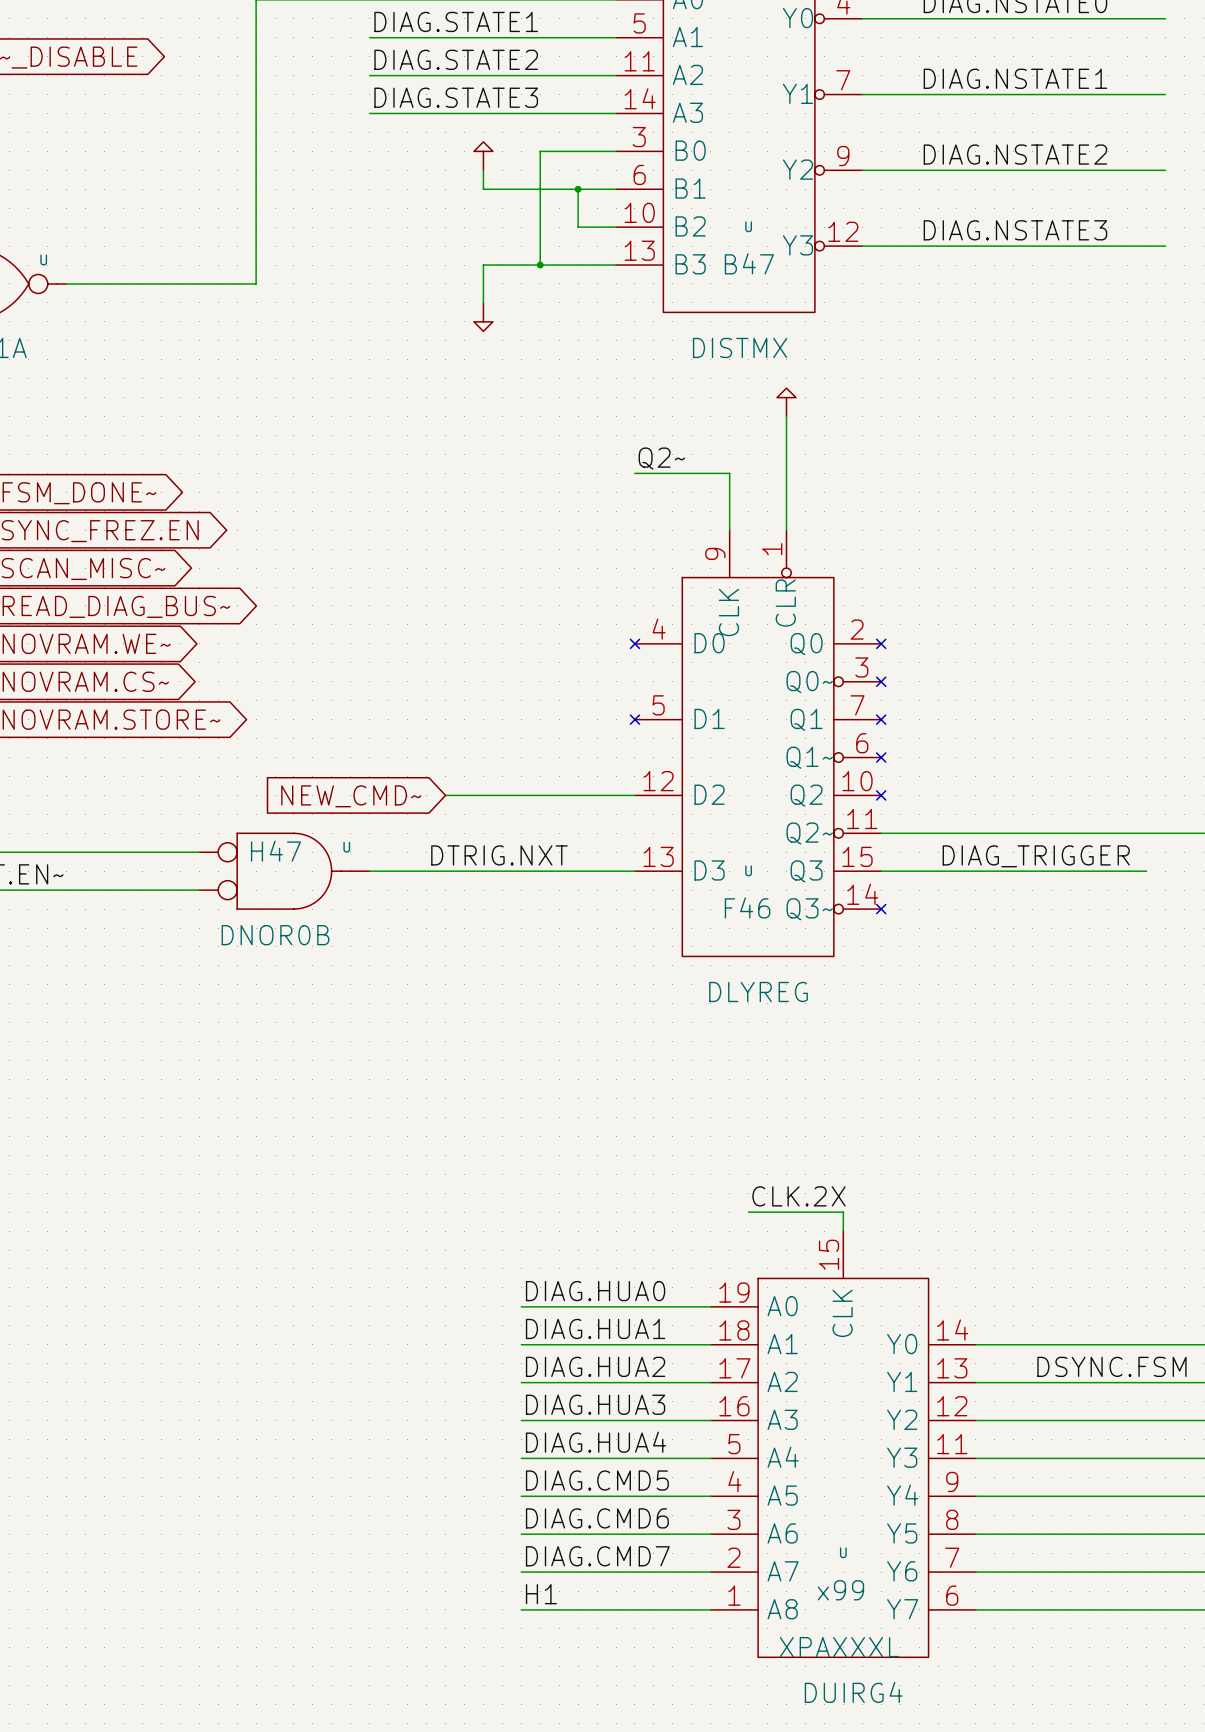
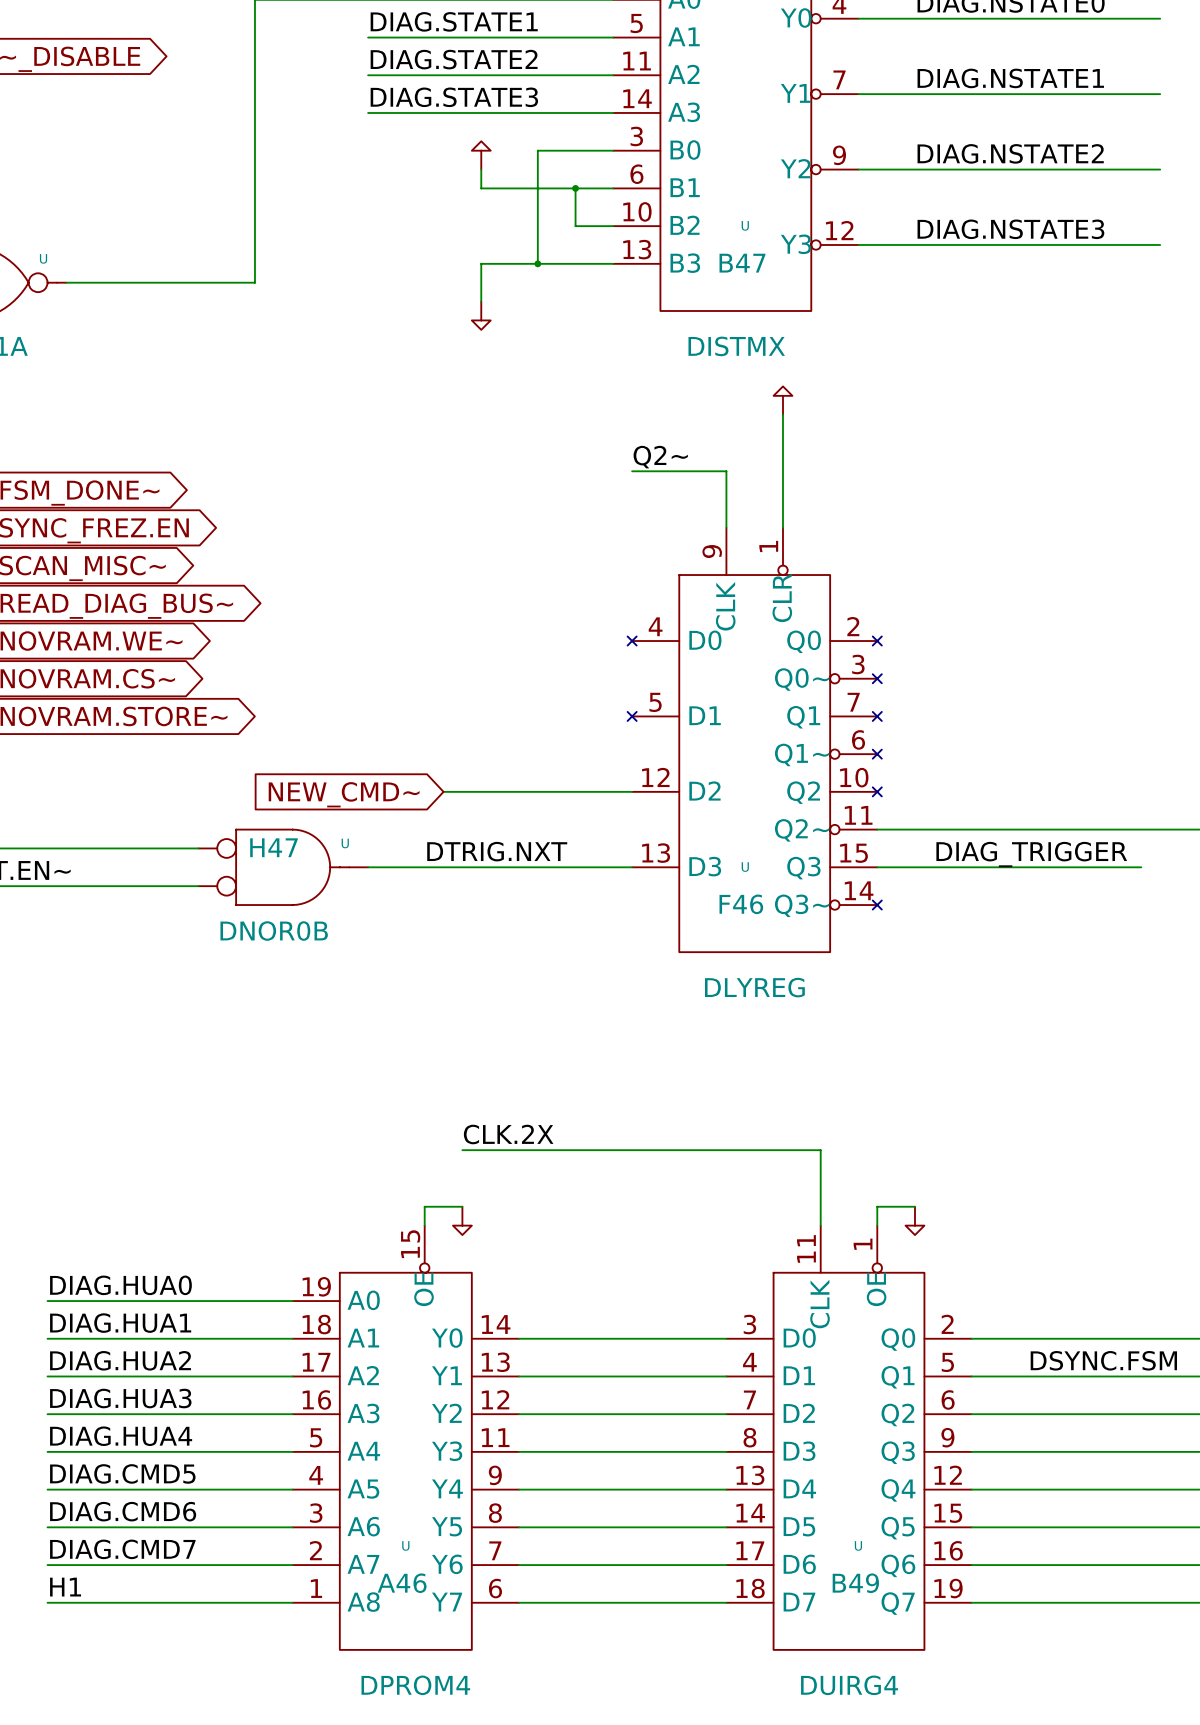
label: none -> CLK.2X (508, 1134)
wire: none -> (462, 1150) (820, 1150) (820, 1225)
label: CLK.2X (798, 1196) -> none
wire: none -> (462, 1206) (424, 1206) (424, 1225)
wire: (748, 1212) (843, 1212) (843, 1231) -> none
wire: none -> (915, 1206) (877, 1206) (877, 1225)
power symbol: none -> (462, 1221)
power symbol: none -> (915, 1221)
label: none -> DIAG.HUA0 (120, 1285)
label: DIAG.HUA0 (595, 1291) -> none
wire: none -> (47, 1301) (292, 1301)
wire: (521, 1306) (710, 1306) -> none
label: none -> DIAG.HUA1 (120, 1323)
label: DIAG.HUA1 (595, 1328) -> none
wire: none -> (47, 1338) (292, 1338)
label: none -> DIAG.HUA2 (120, 1360)
label: DIAG.HUA2 (595, 1366) -> none
wire: none -> (47, 1376) (292, 1376)
label: none -> DIAG.HUA3 (120, 1398)
label: DIAG.HUA3 (595, 1404) -> none
wire: none -> (47, 1414) (292, 1414)
label: none -> DIAG.HUA4 (121, 1436)
label: DIAG.HUA4 (596, 1442) -> none
U: none -> (405, 1437)
U: XPAXXXL (843, 1444) -> none
U: none -> (848, 1437)
wire: none -> (47, 1451) (292, 1451)
label: none -> DIAG.CMD5 (122, 1473)
label: DIAG.CMD5 (597, 1480) -> none
wire: none -> (47, 1489) (292, 1489)
label: none -> DIAG.CMD6 (123, 1511)
label: DIAG.CMD6 (597, 1518) -> none
wire: none -> (47, 1527) (292, 1527)
label: none -> DIAG.CMD7 (122, 1549)
label: DIAG.CMD7 (597, 1556) -> none
wire: none -> (47, 1565) (292, 1565)
label: none -> H1 (65, 1587)
label: H1 (541, 1594) -> none
wire: none -> (47, 1602) (292, 1602)

